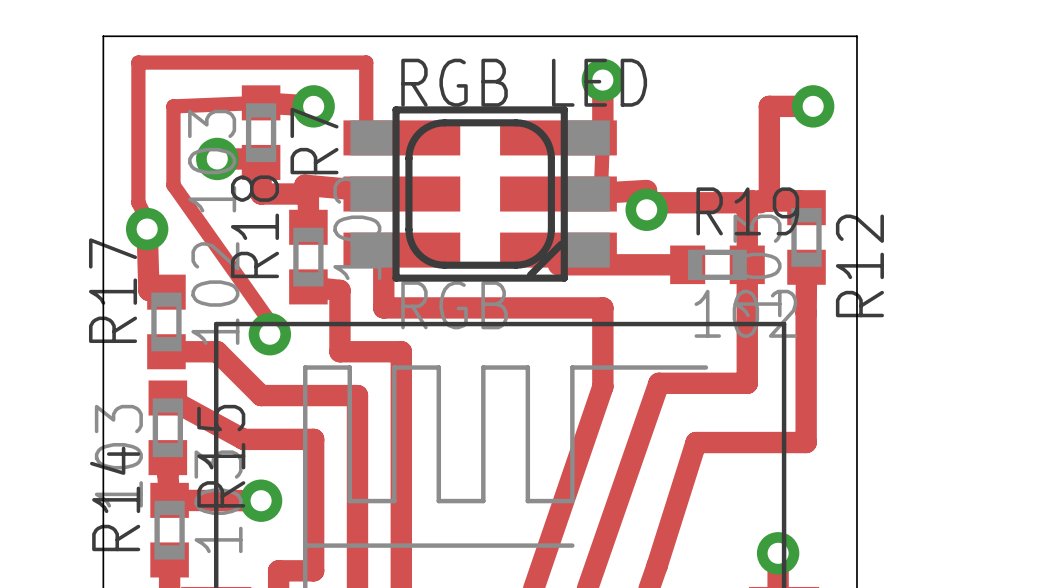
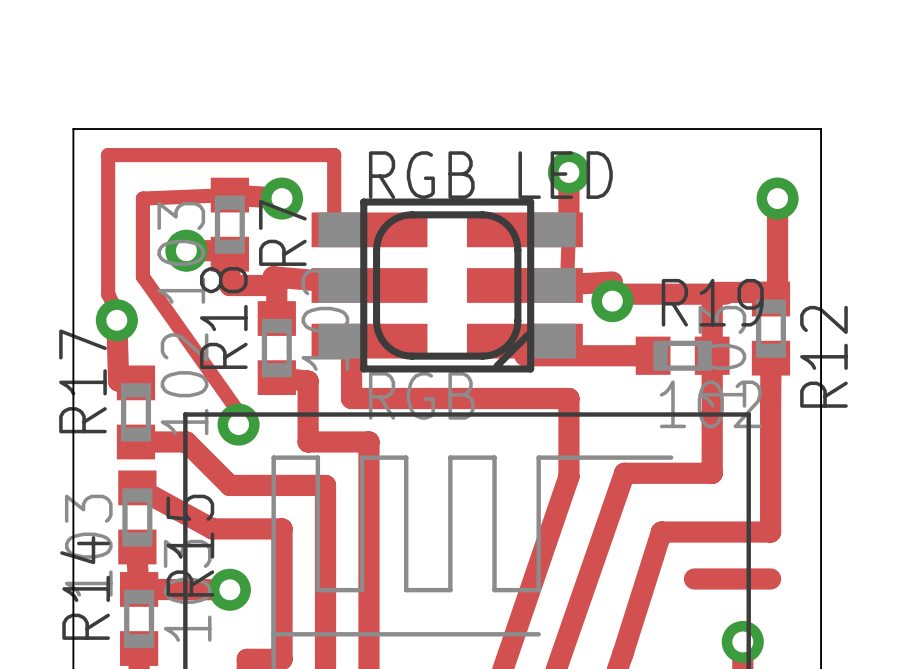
track: none -> (777, 189) (777, 292) (764, 292)
track: (813, 106) (769, 106) (769, 201) -> none
track: none -> (694, 578) (770, 578)

